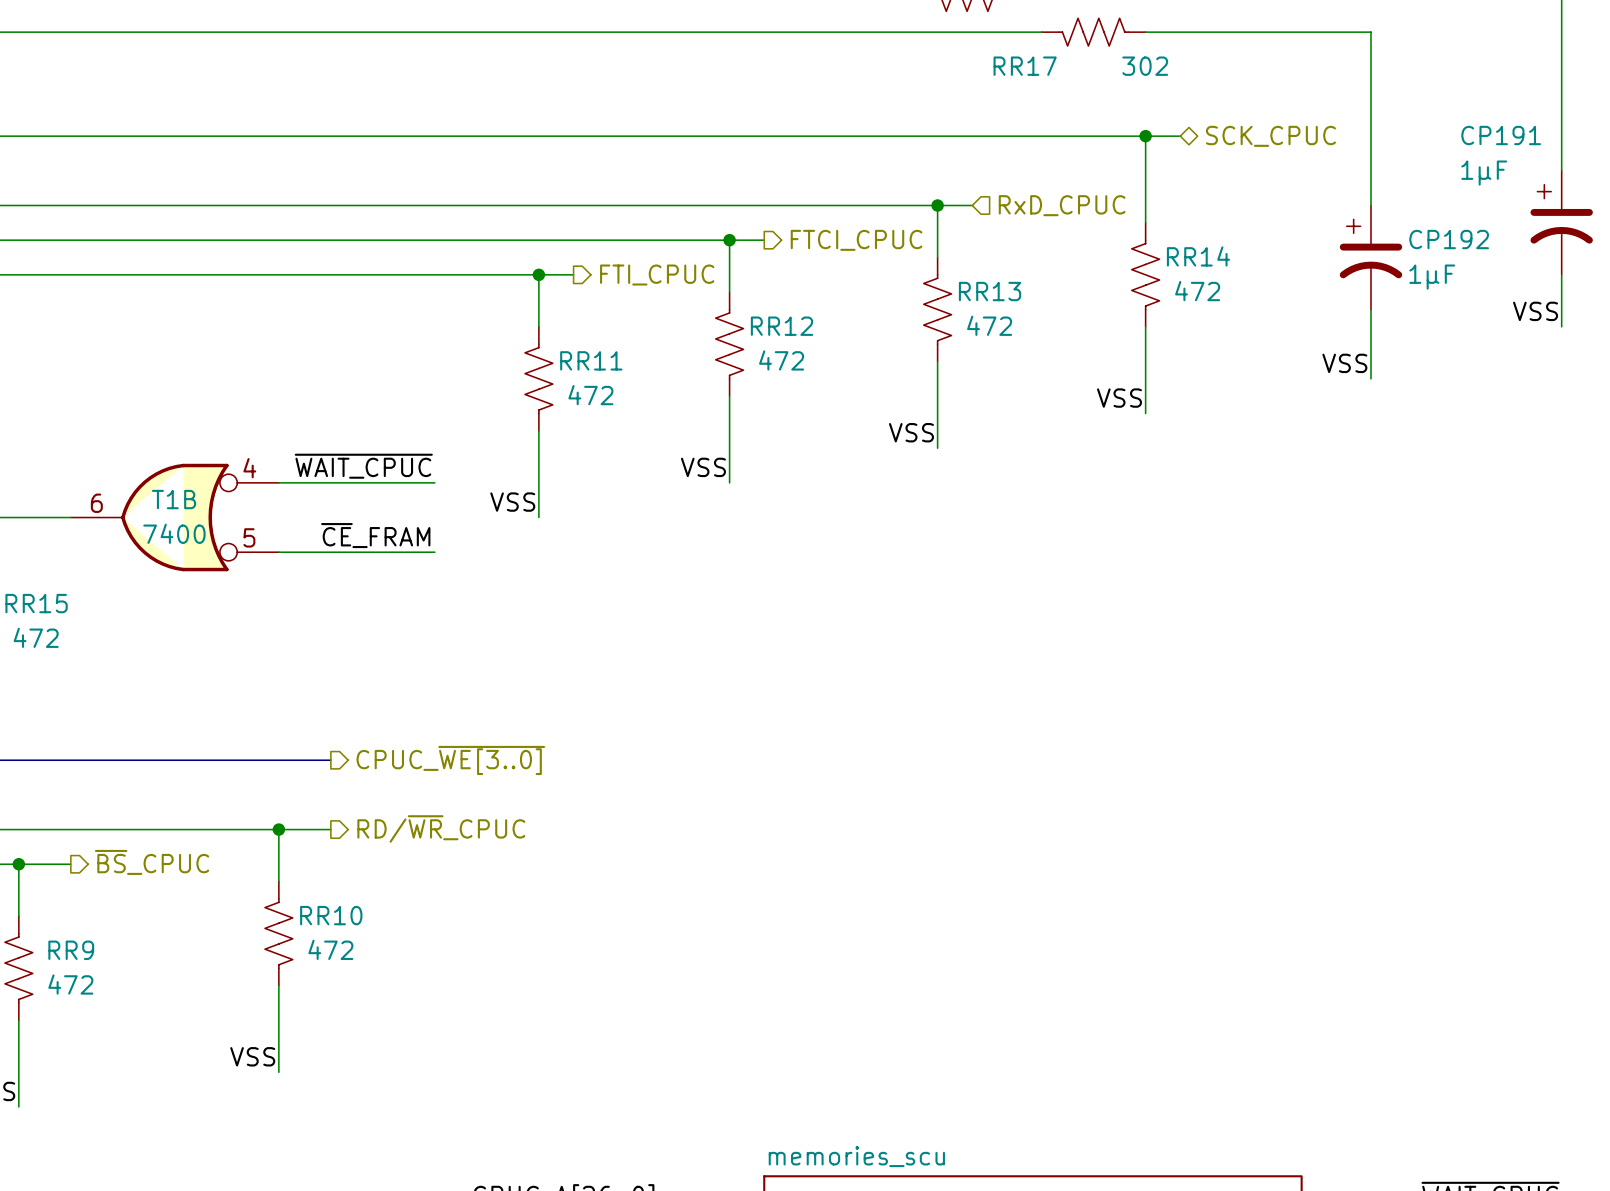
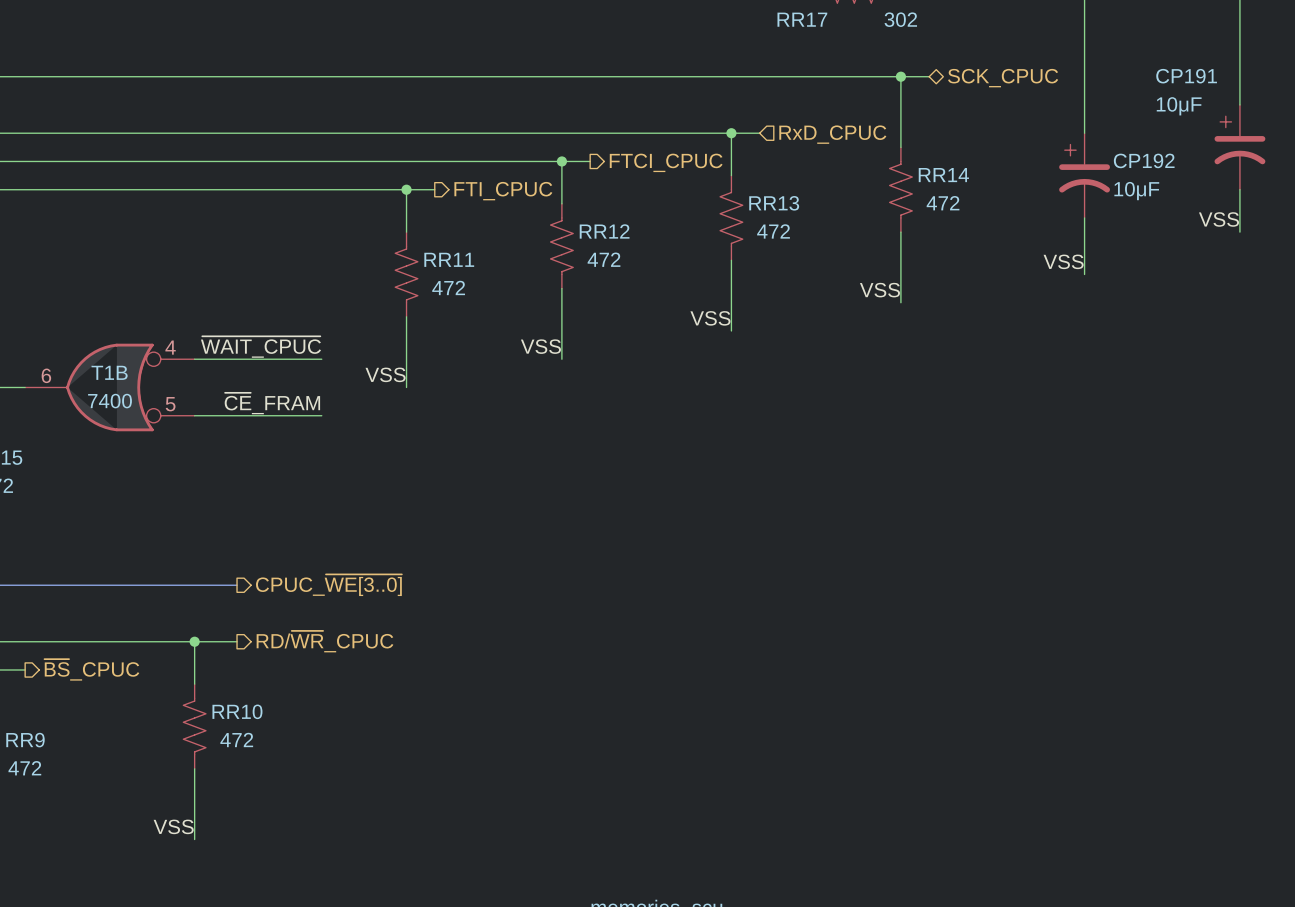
CP191 value: 1µF (1484, 173) -> 10μF (1179, 106)
CP192 value: 1µF (1432, 277) -> 10μF (1136, 191)

